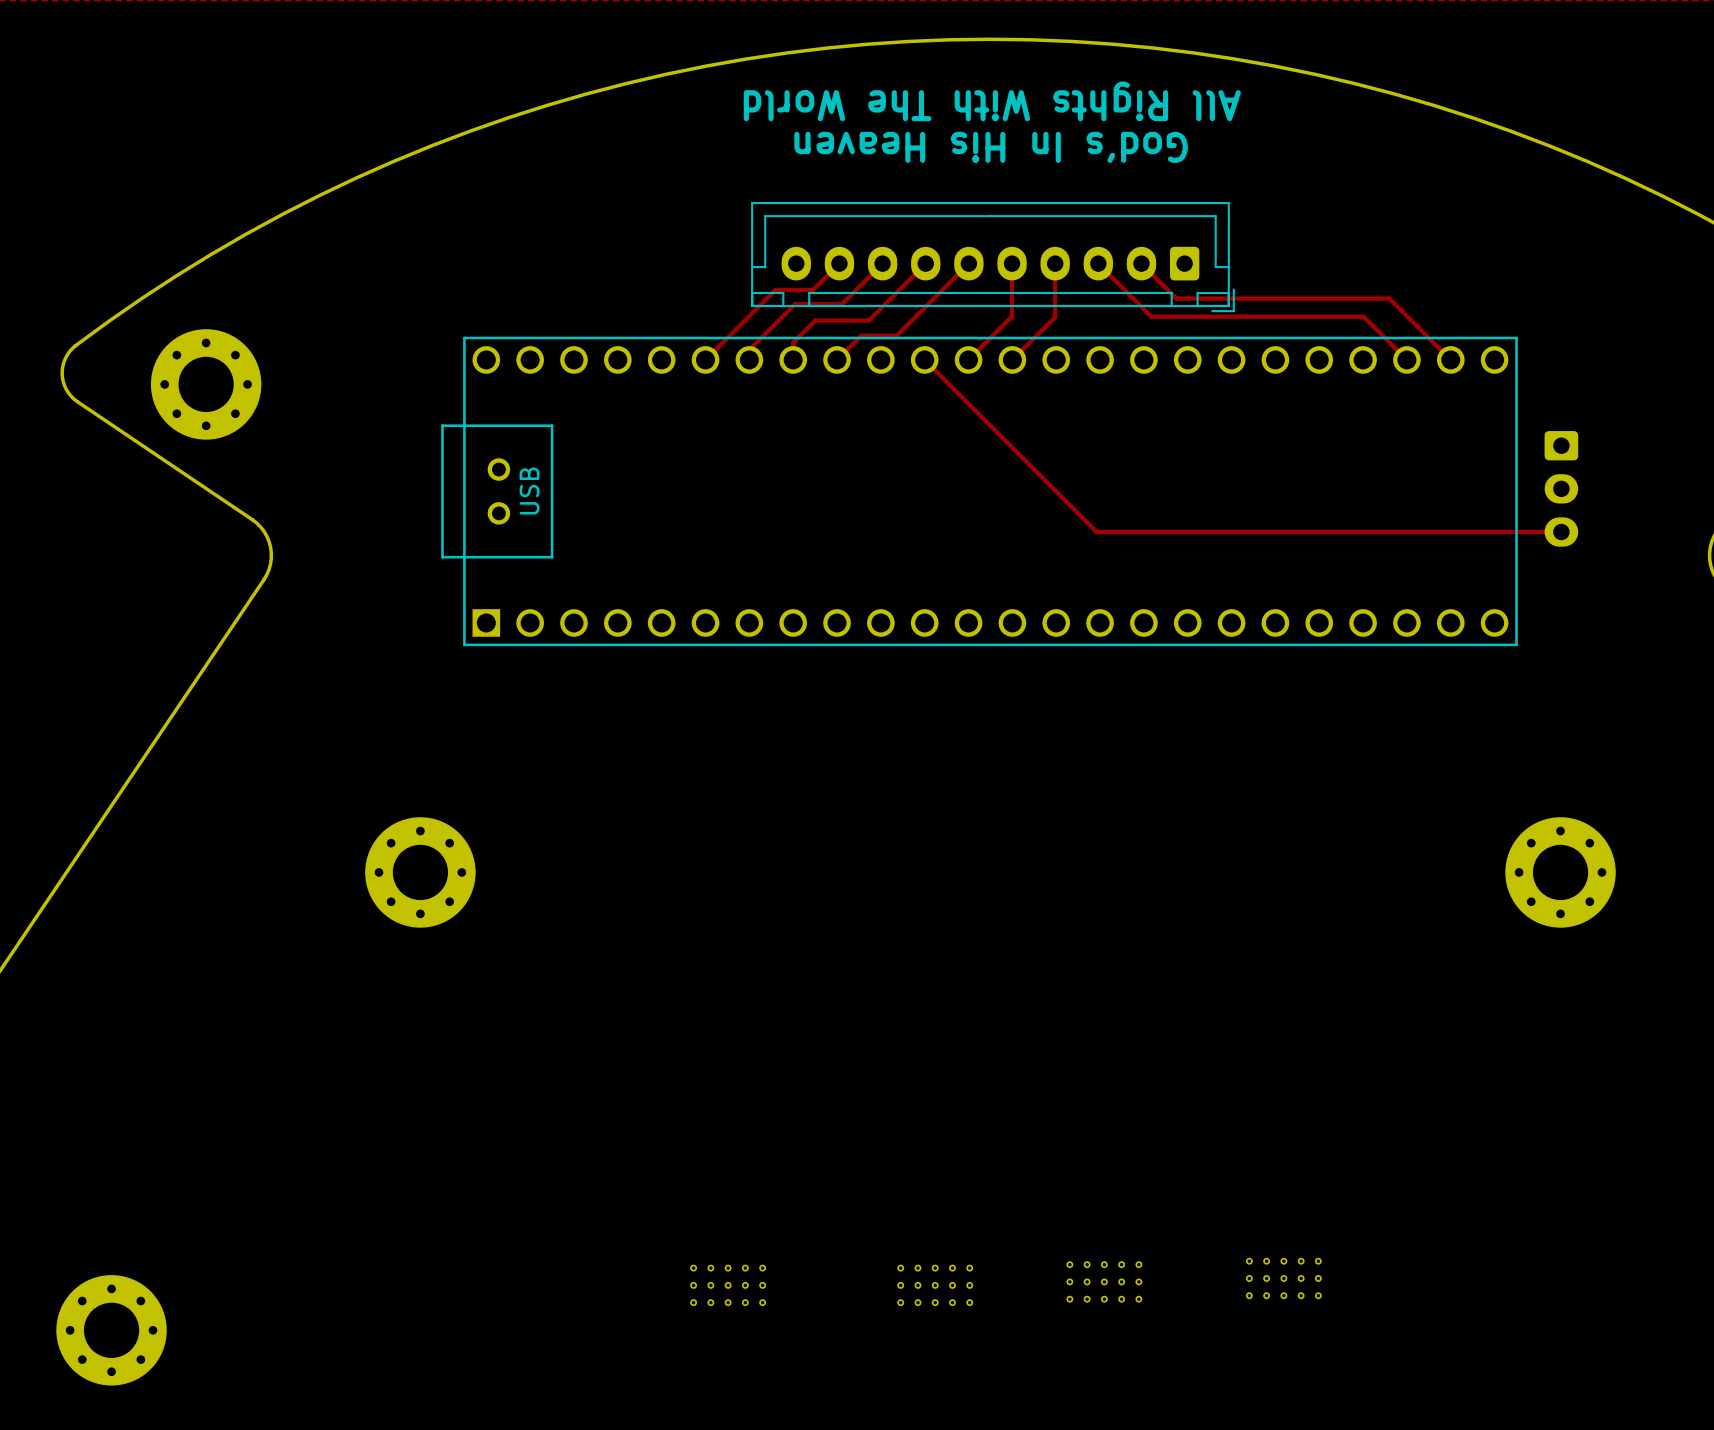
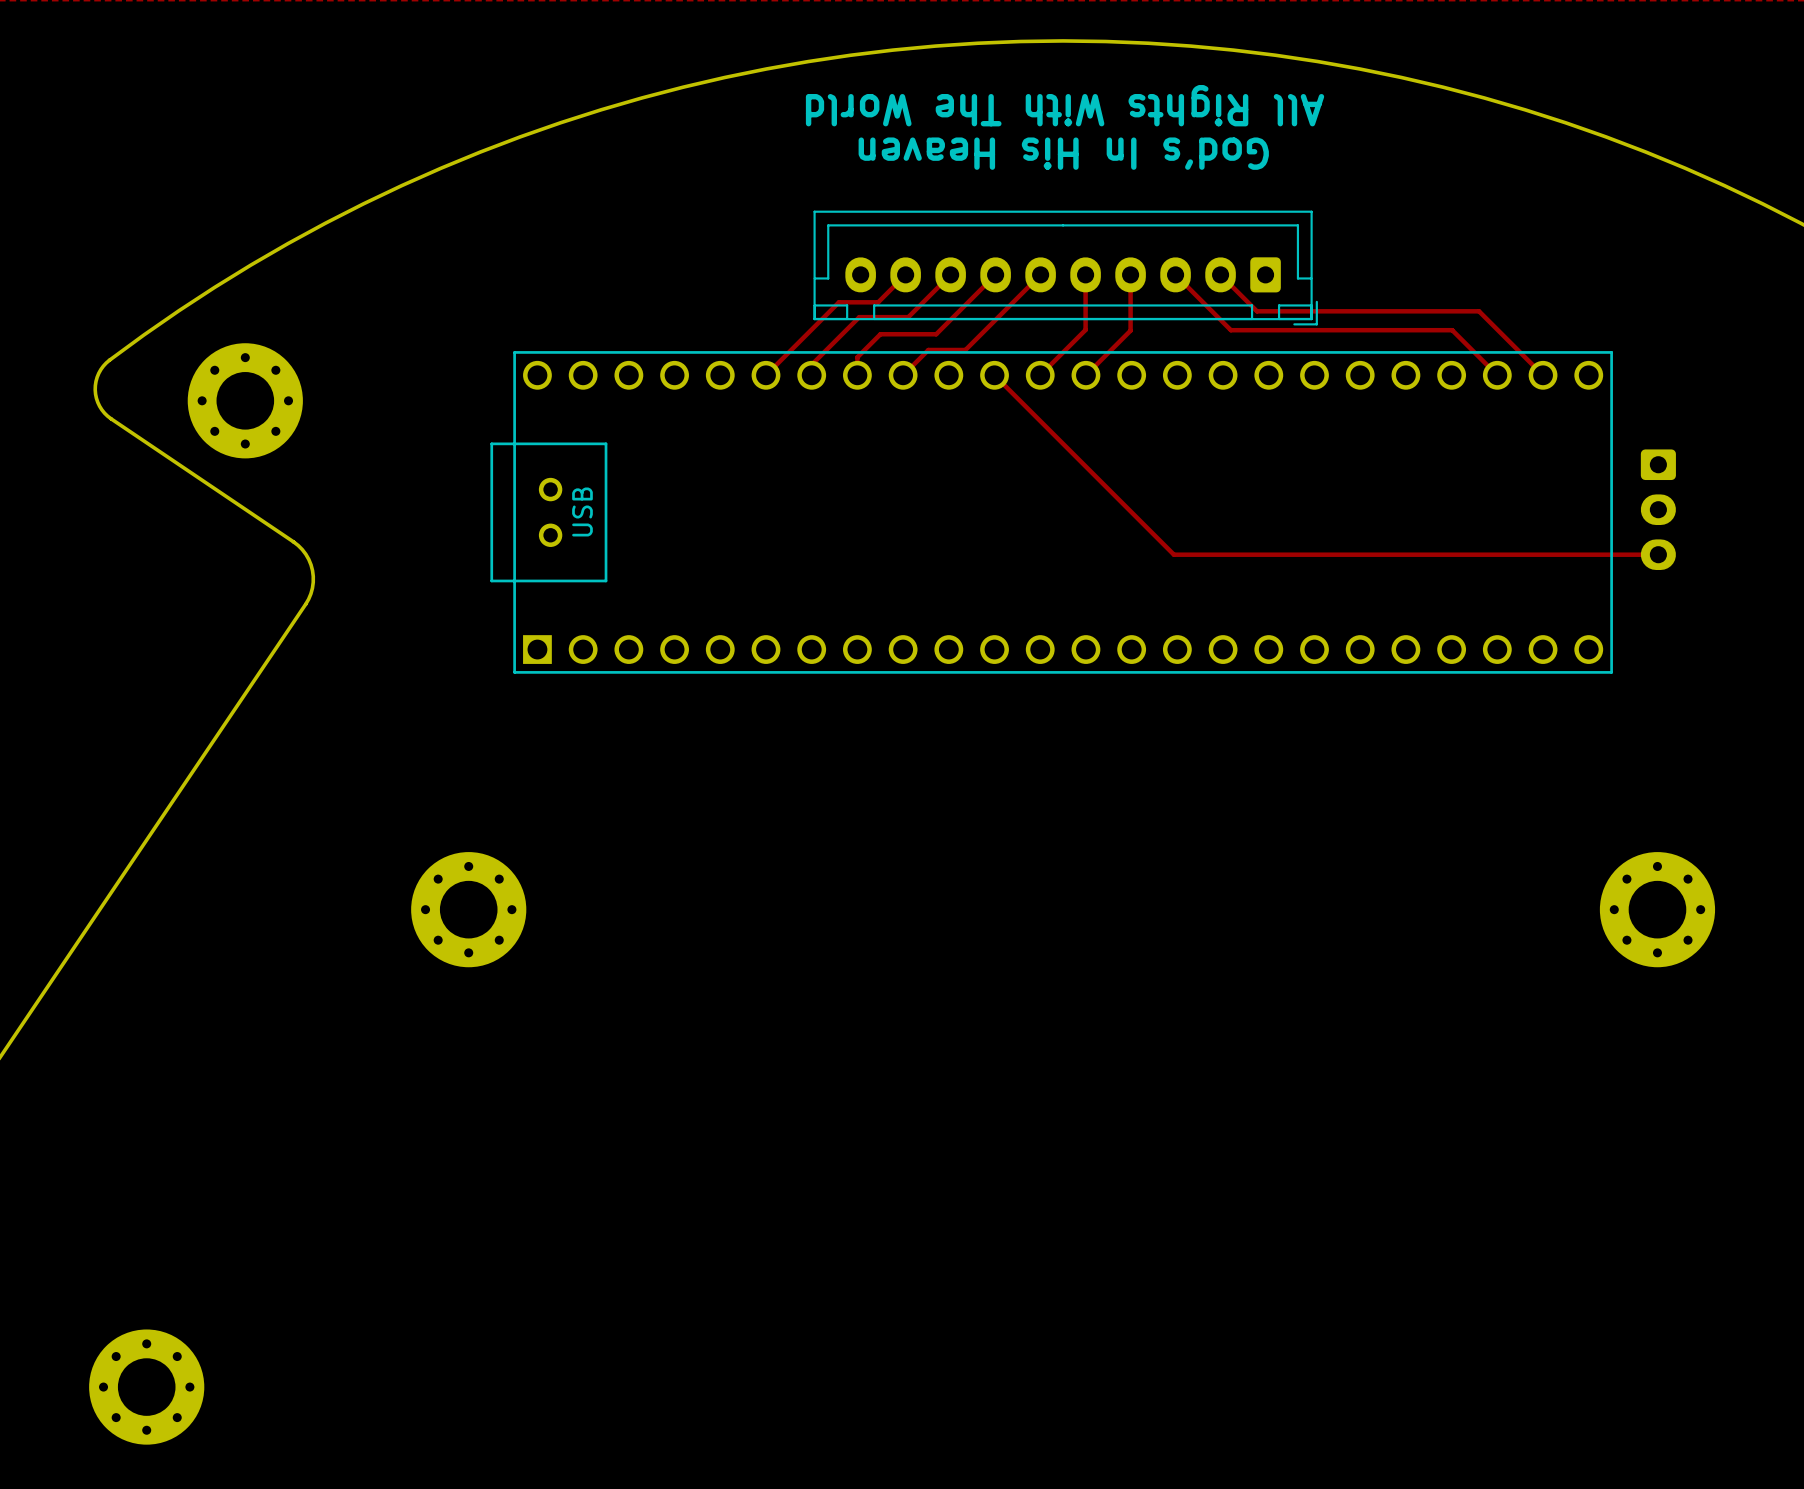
part: (1283, 1278) -> none
part: (1104, 1281) -> none
part: (728, 1285) -> none
part: (935, 1285) -> none

